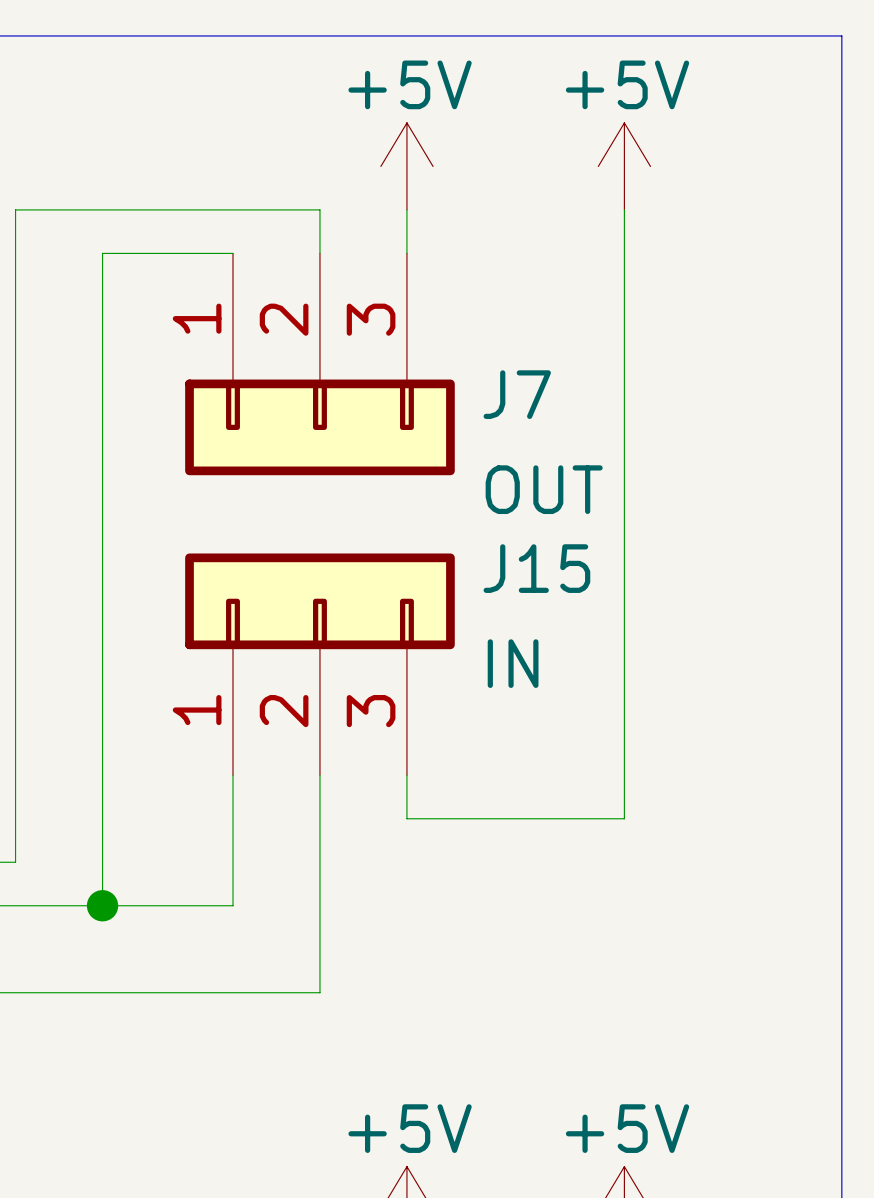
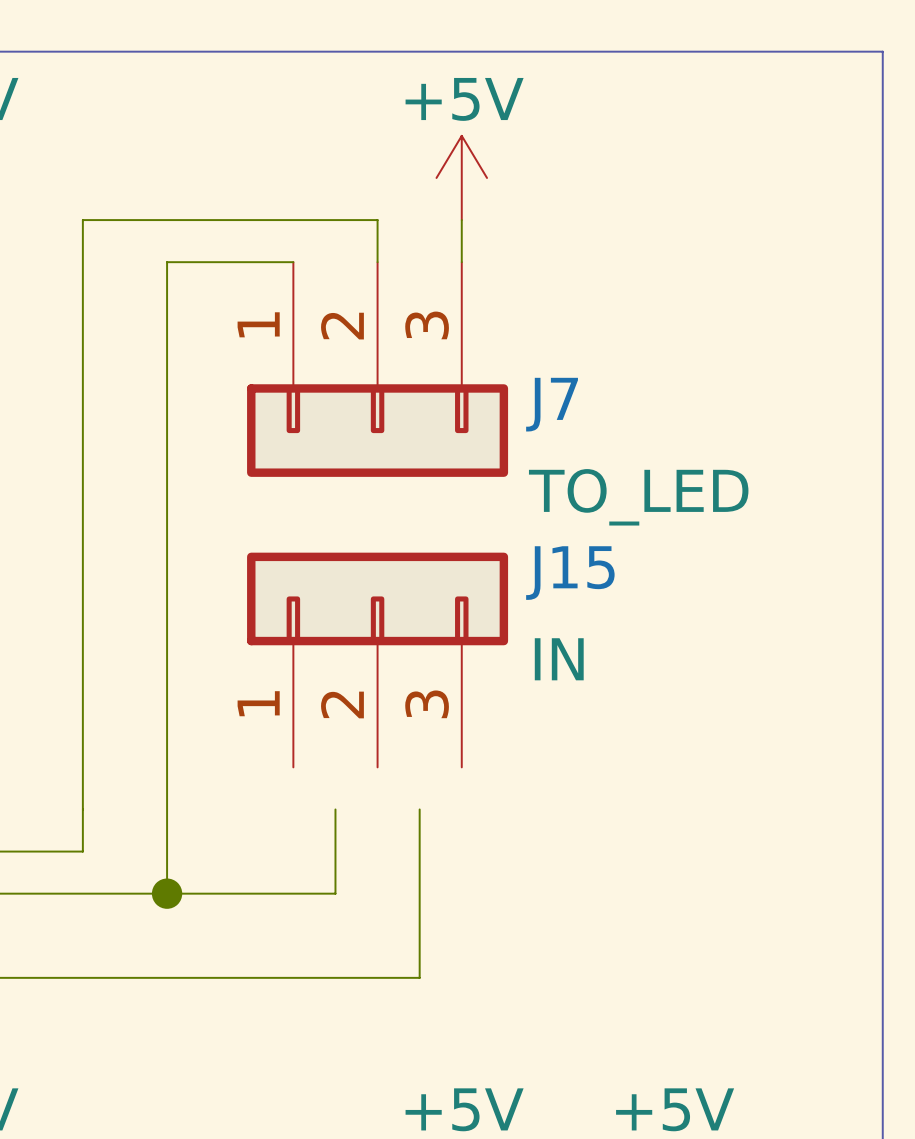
power symbol: +5V (624, 166) -> none
wire: (624, 209) (624, 818) (406, 818) (406, 775) -> none
J7 value: OUT (544, 489) -> TO_LED (638, 497)
wire: (233, 775) (233, 905) -> (335, 809) (335, 893) (293, 893)
wire: (319, 775) (319, 992) -> (419, 809) (419, 977) (377, 977)

